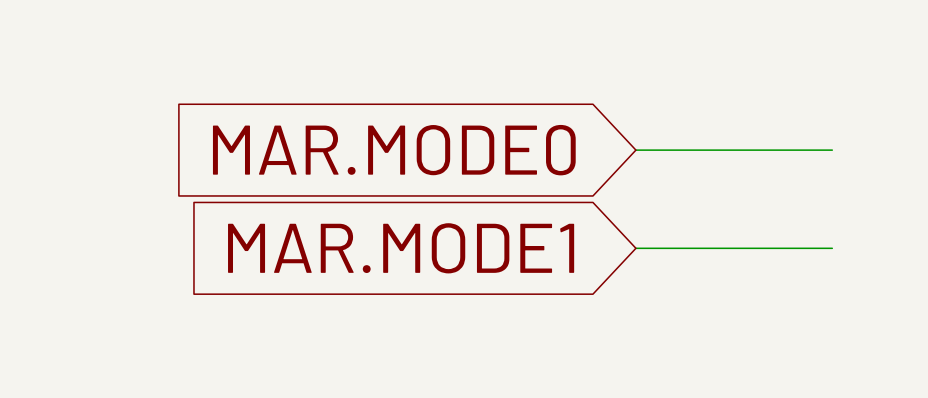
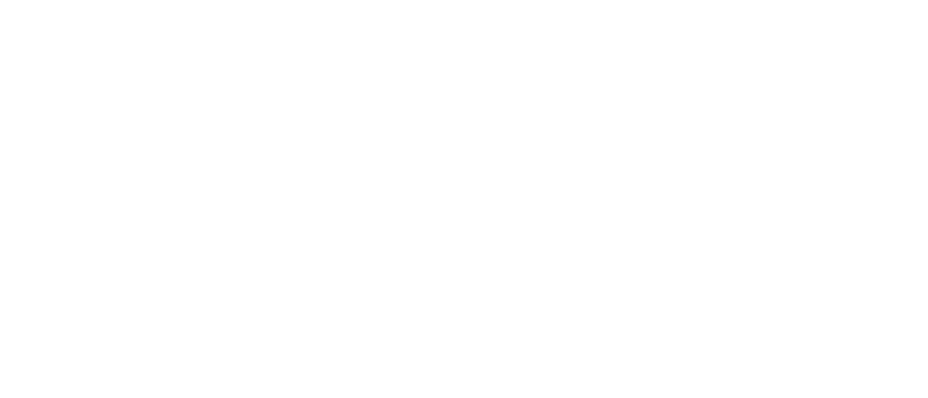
global label: MAR.MODE0 (394, 150) -> none
wire: (635, 150) (832, 150) -> none
global label: MAR.MODE1 (401, 248) -> none
wire: (635, 248) (832, 248) -> none

